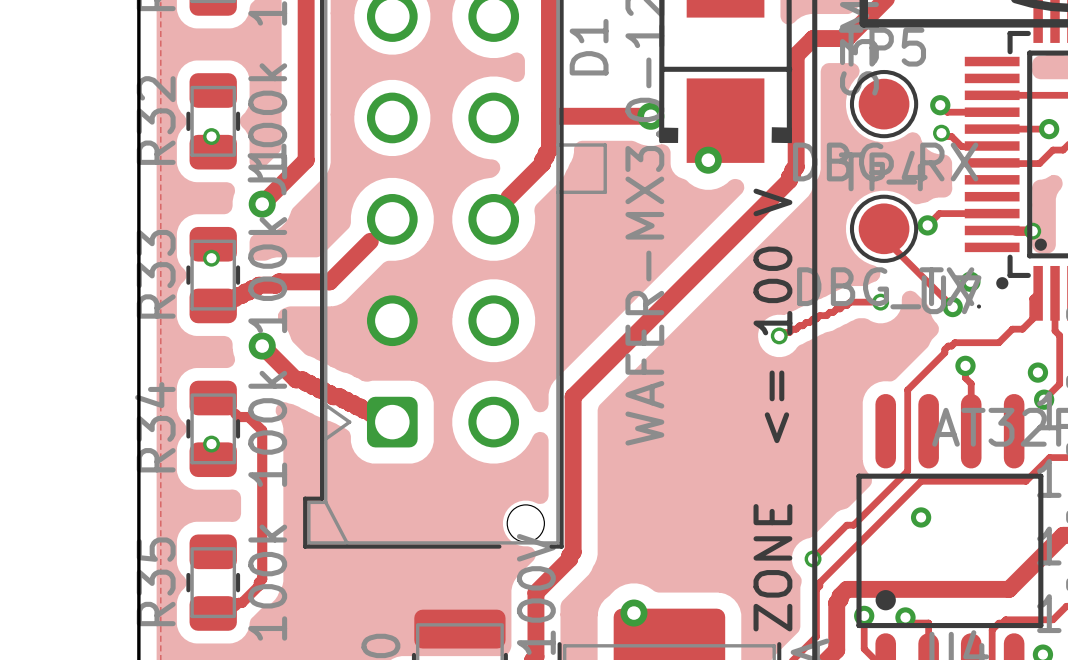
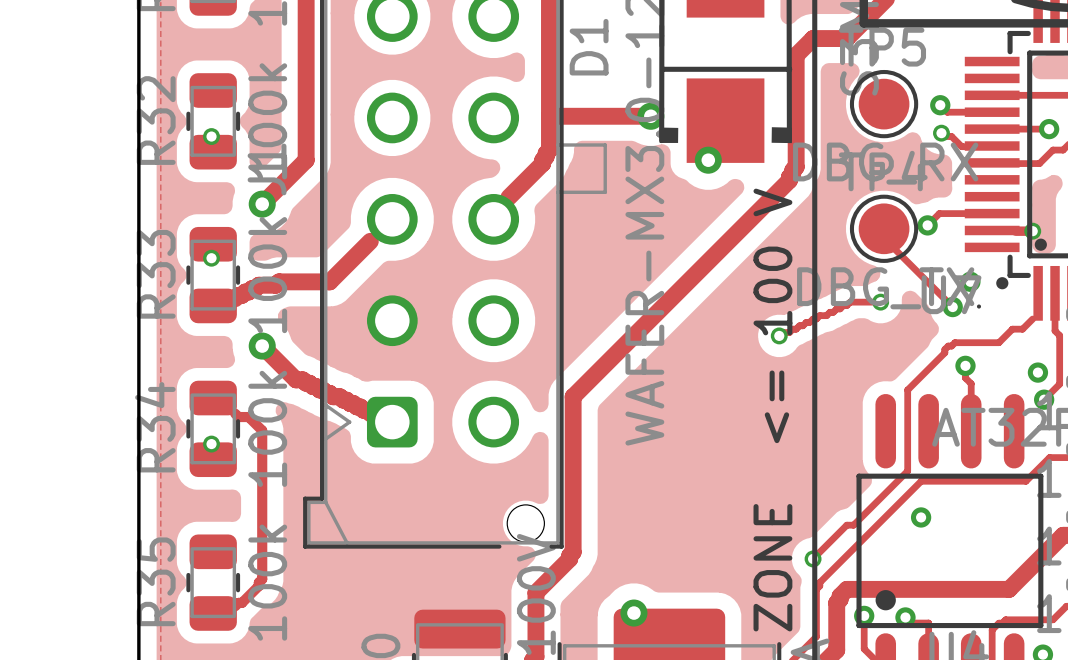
track: (1038, 293) (1032, 298) (1032, 319) -> none

